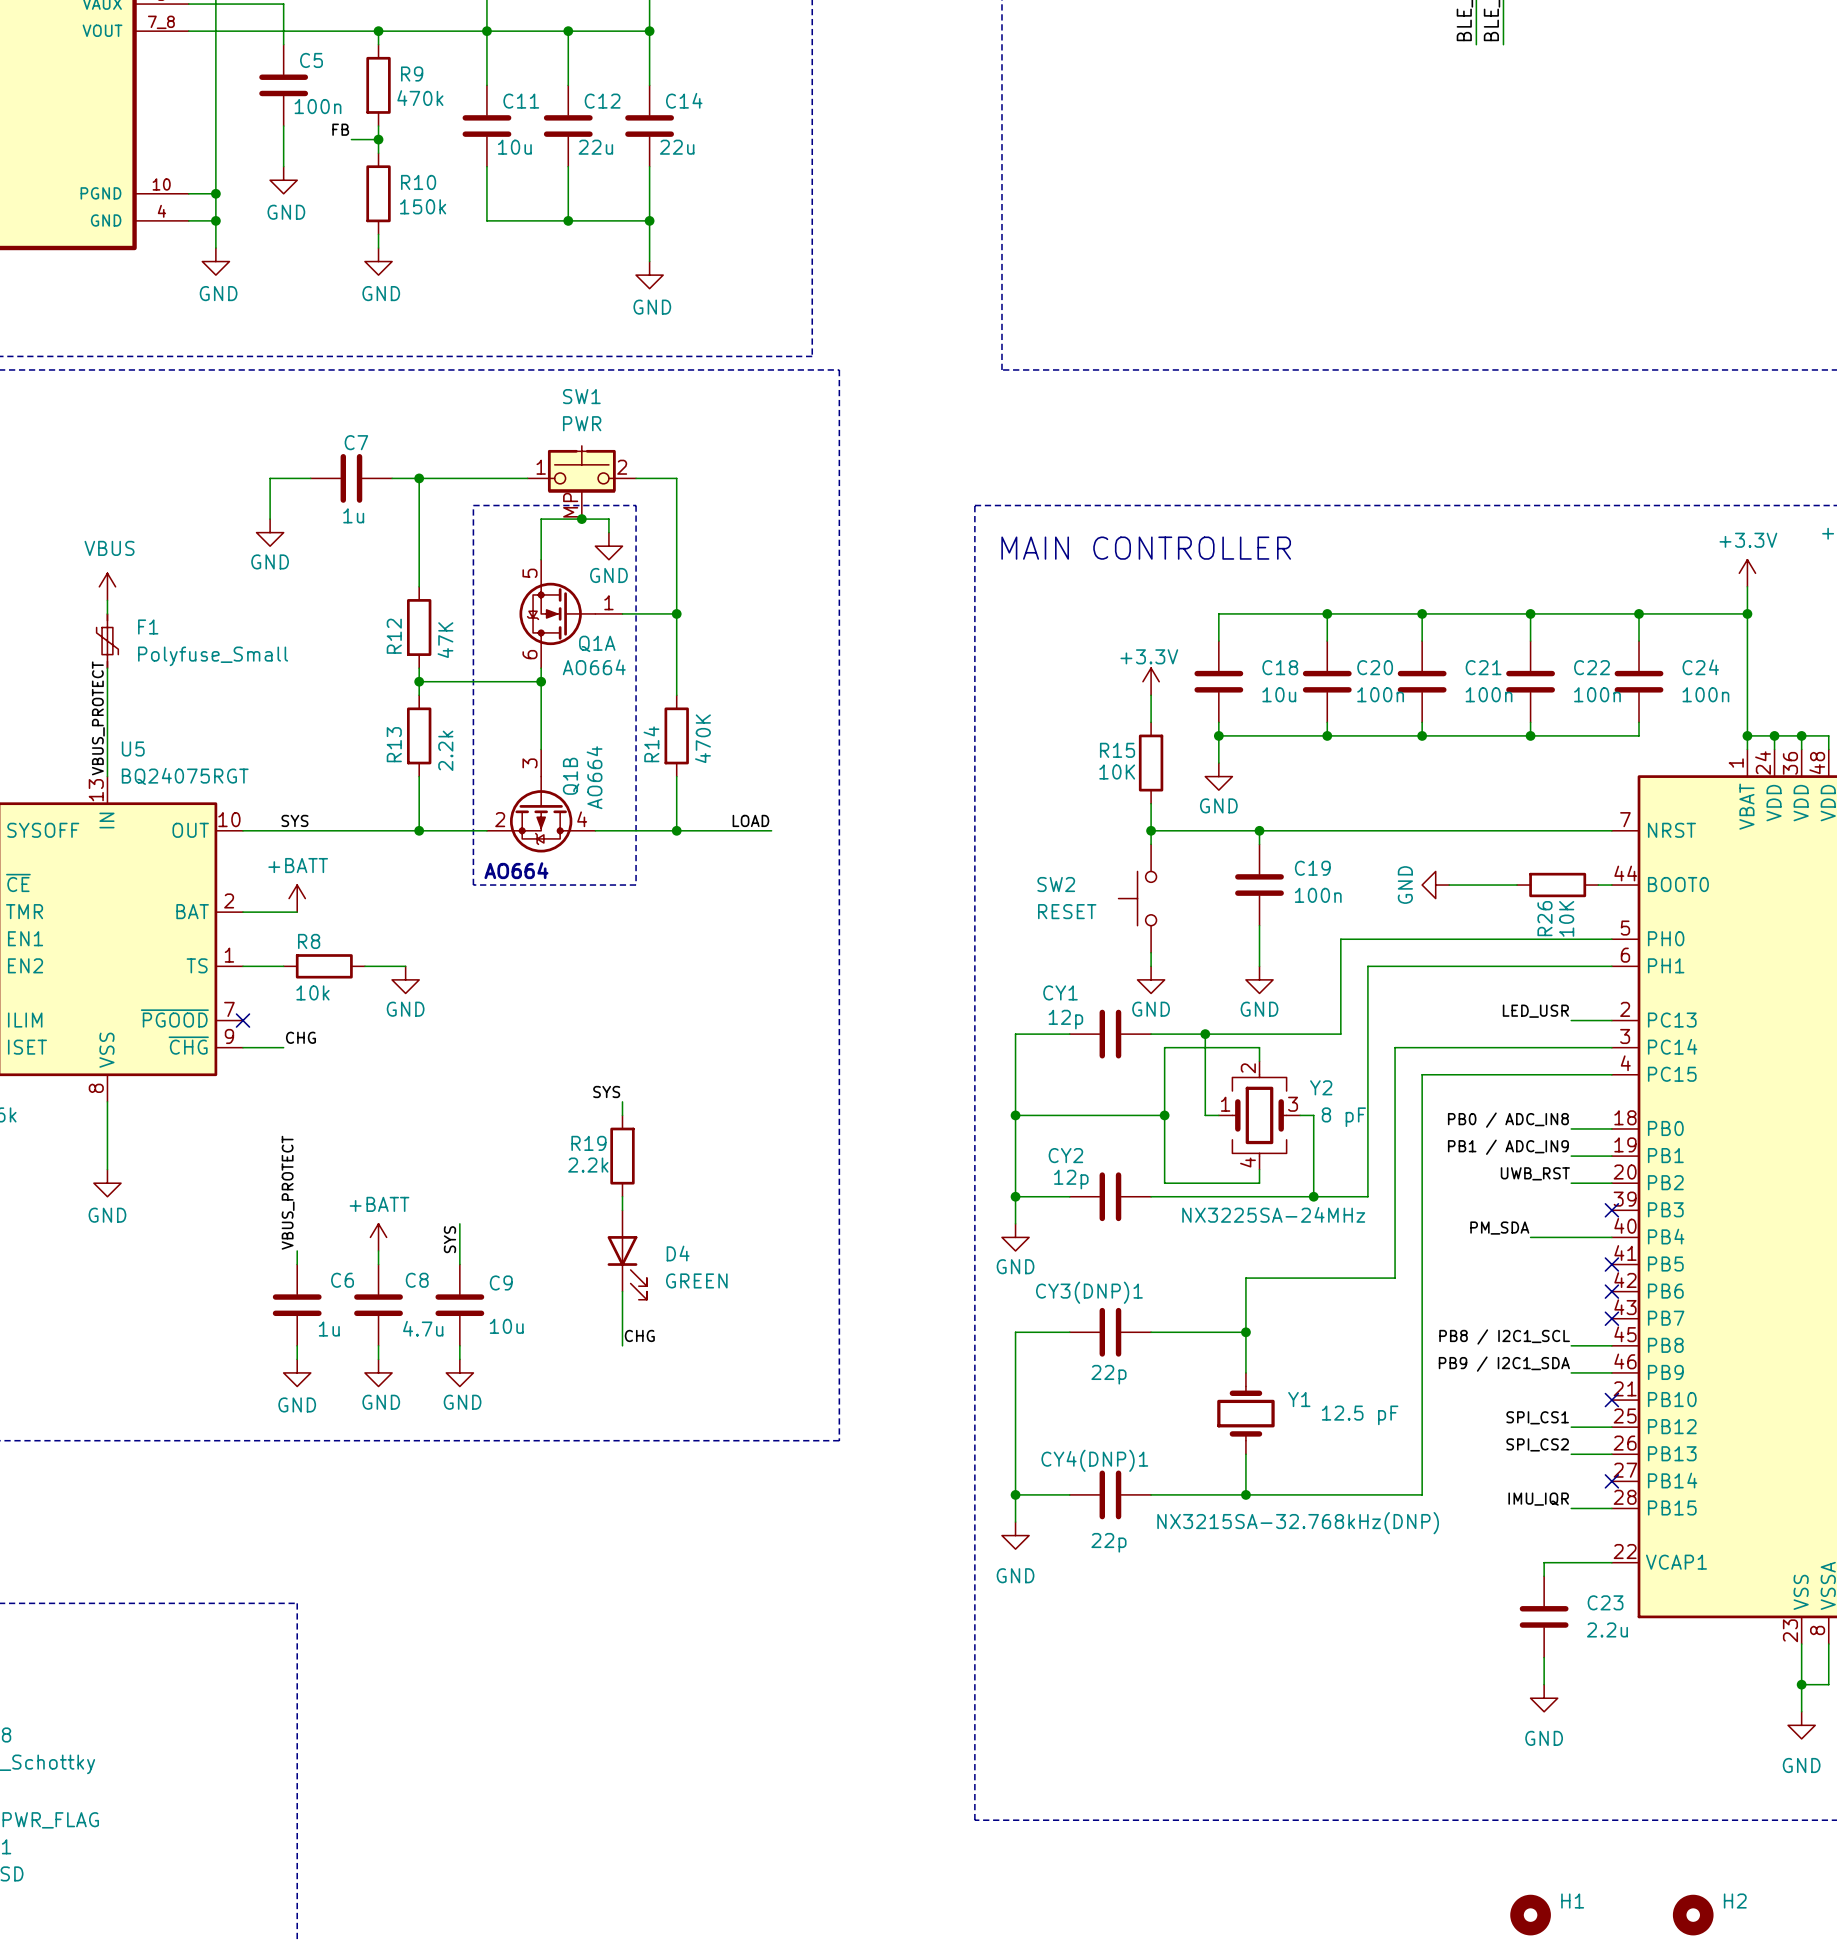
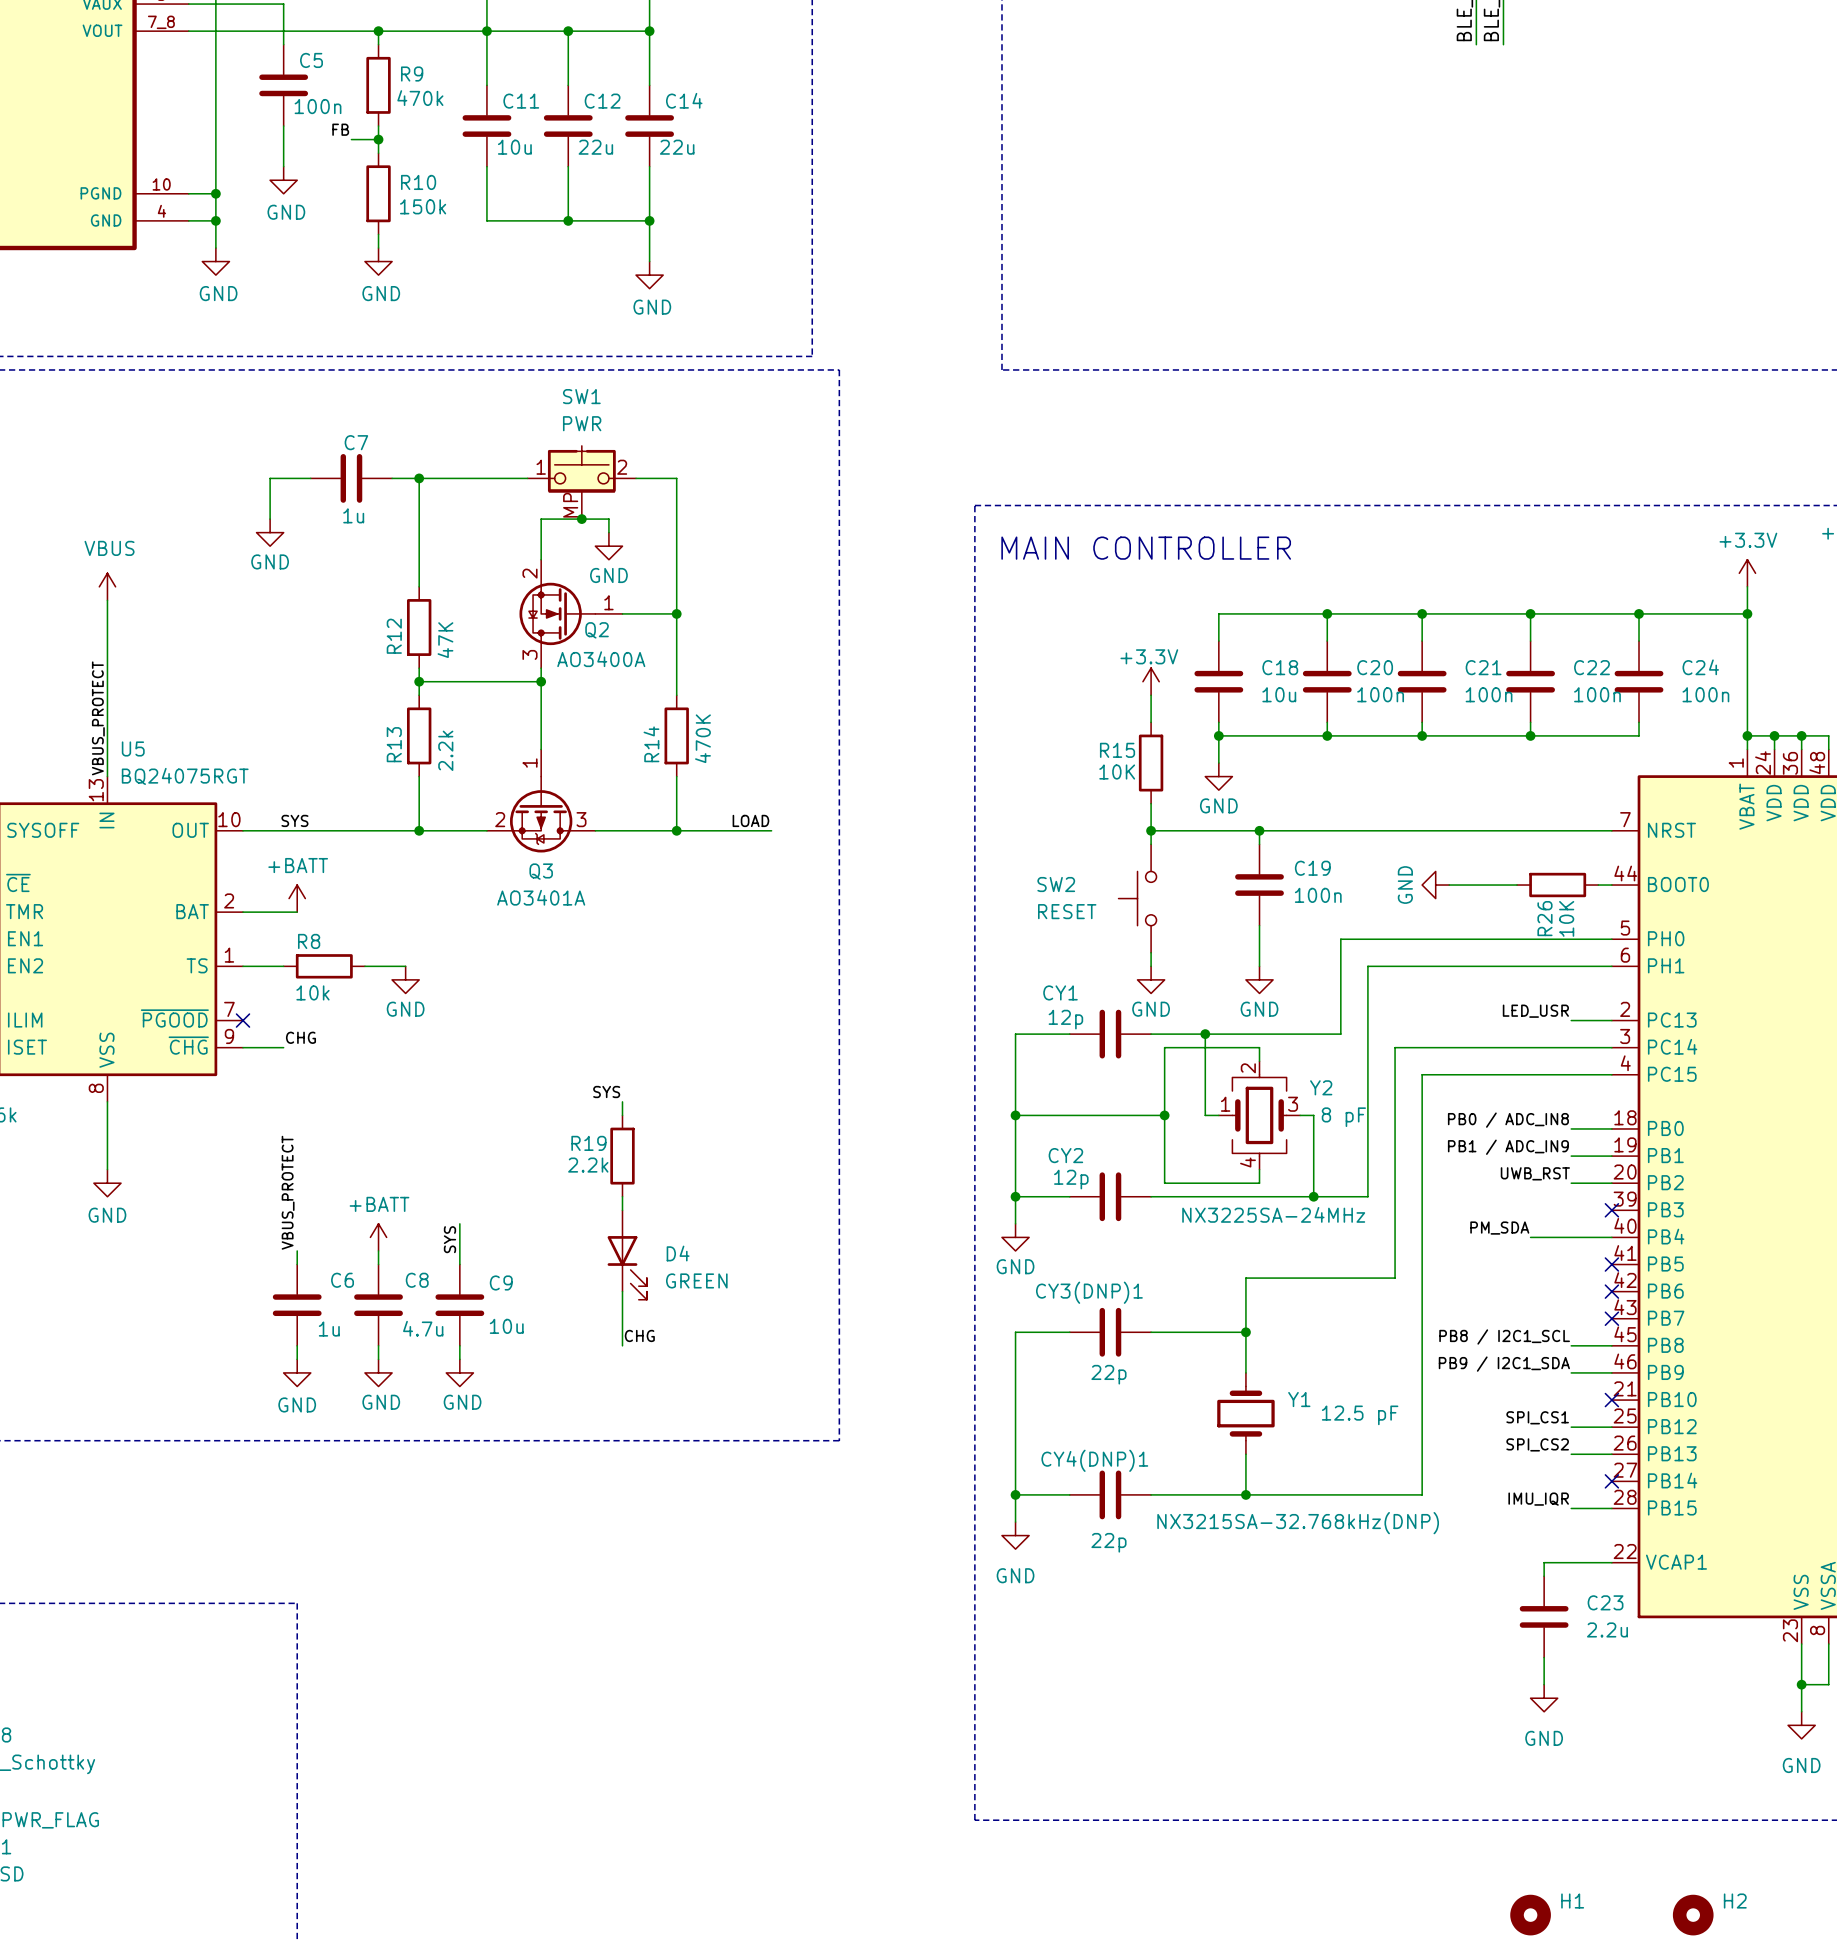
line: (473, 505) (636, 505) (636, 885) (473, 885) (473, 505) -> none
Q1A: AO664 (570, 613) -> none
Q2: none -> AO3400A (570, 613)
F1: Polyfuse_Small (107, 641) -> none
Q1B pin number: 3 (529, 763) -> 1 (529, 763)
Q1B name: Q1B (571, 776) -> Q3 (541, 871)
Q1B value: AO664 (594, 777) -> AO3401A (541, 897)
Q1B pin number: 4 (582, 819) -> 3 (581, 819)
text: AO664 (516, 870) -> none

